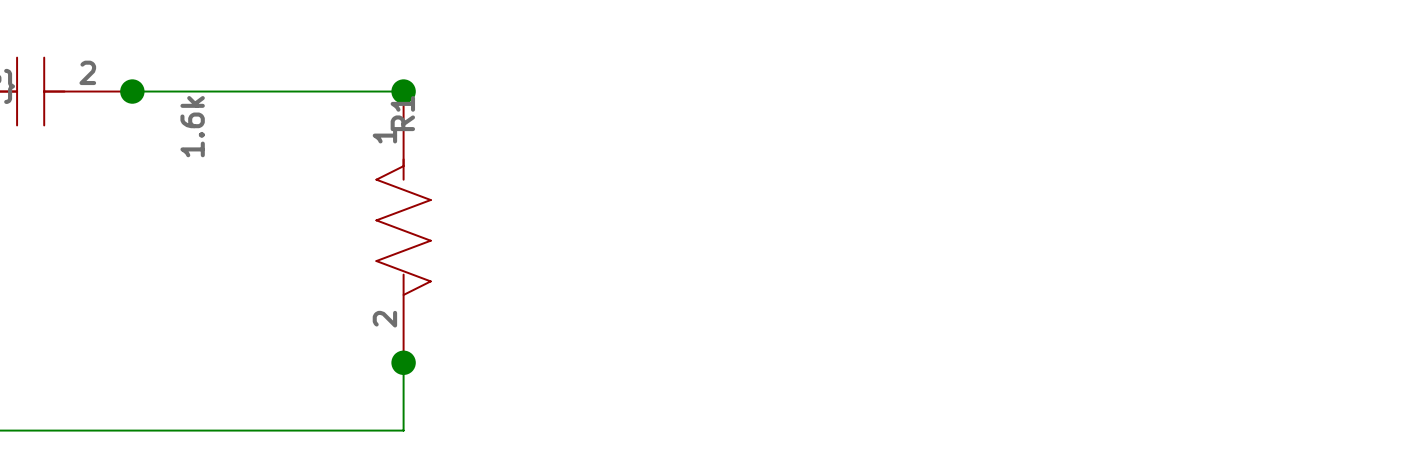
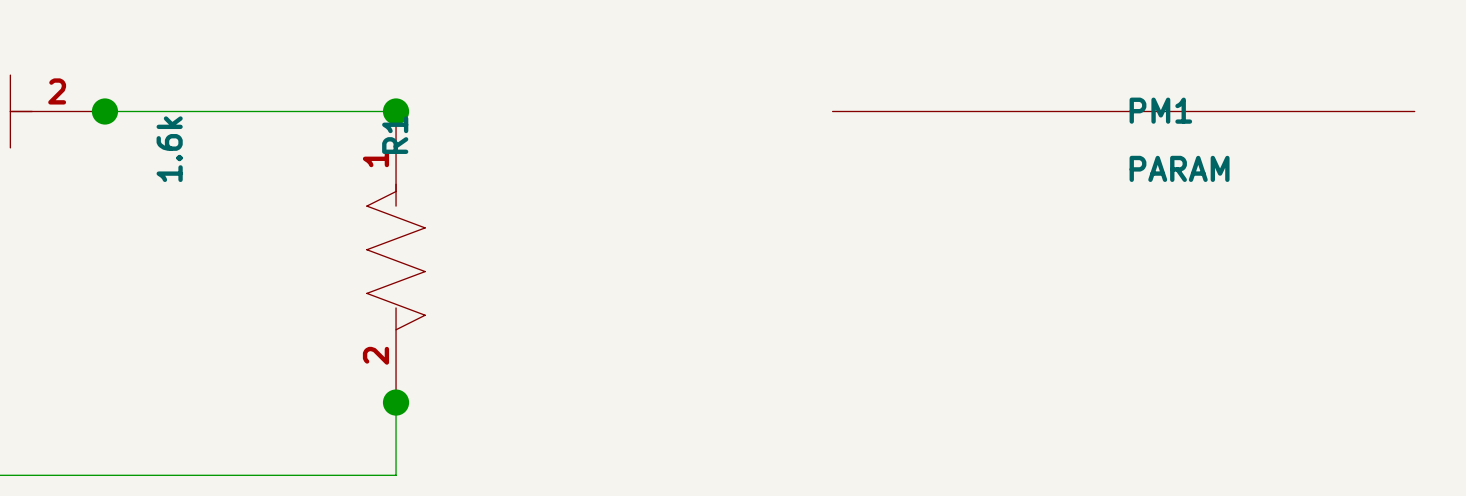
PM1: none -> PARAM (1123, 111)

